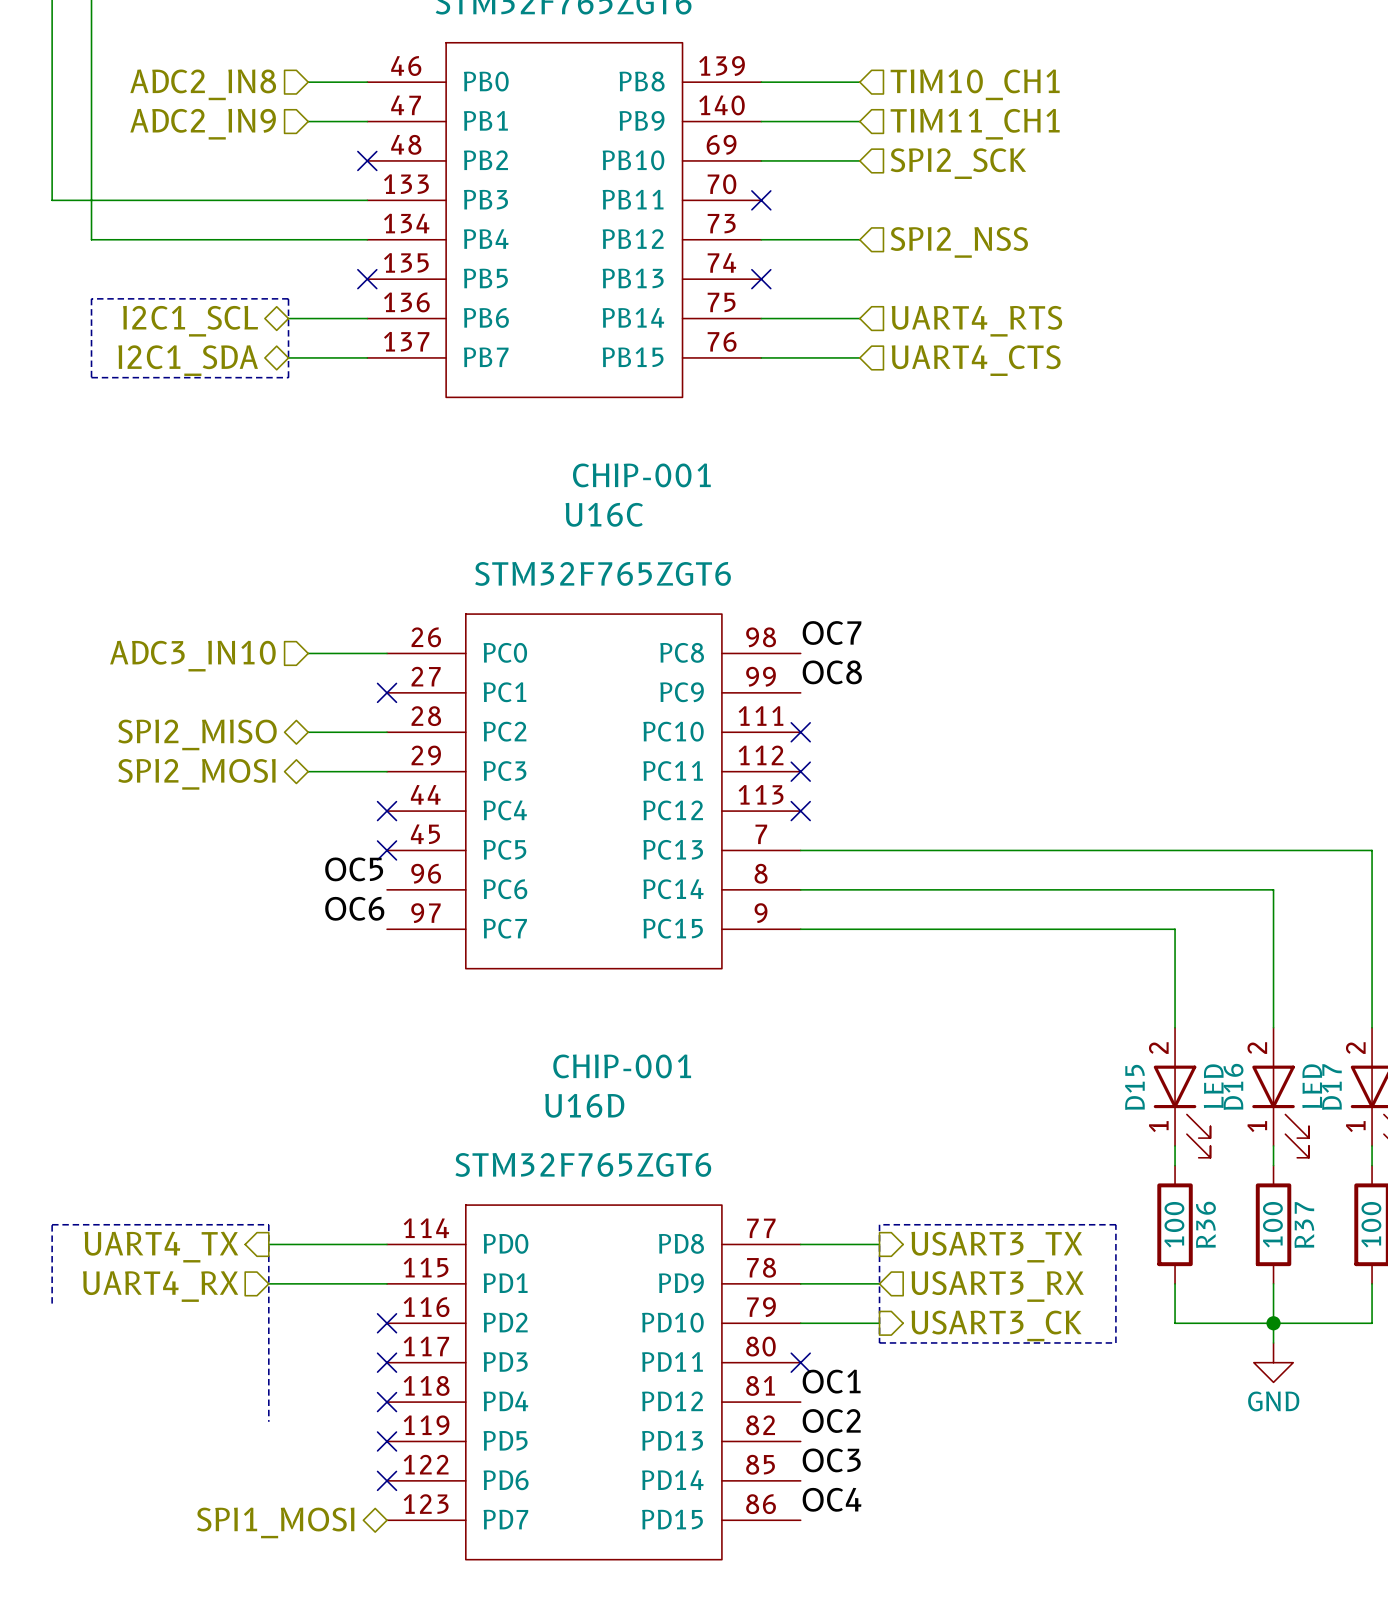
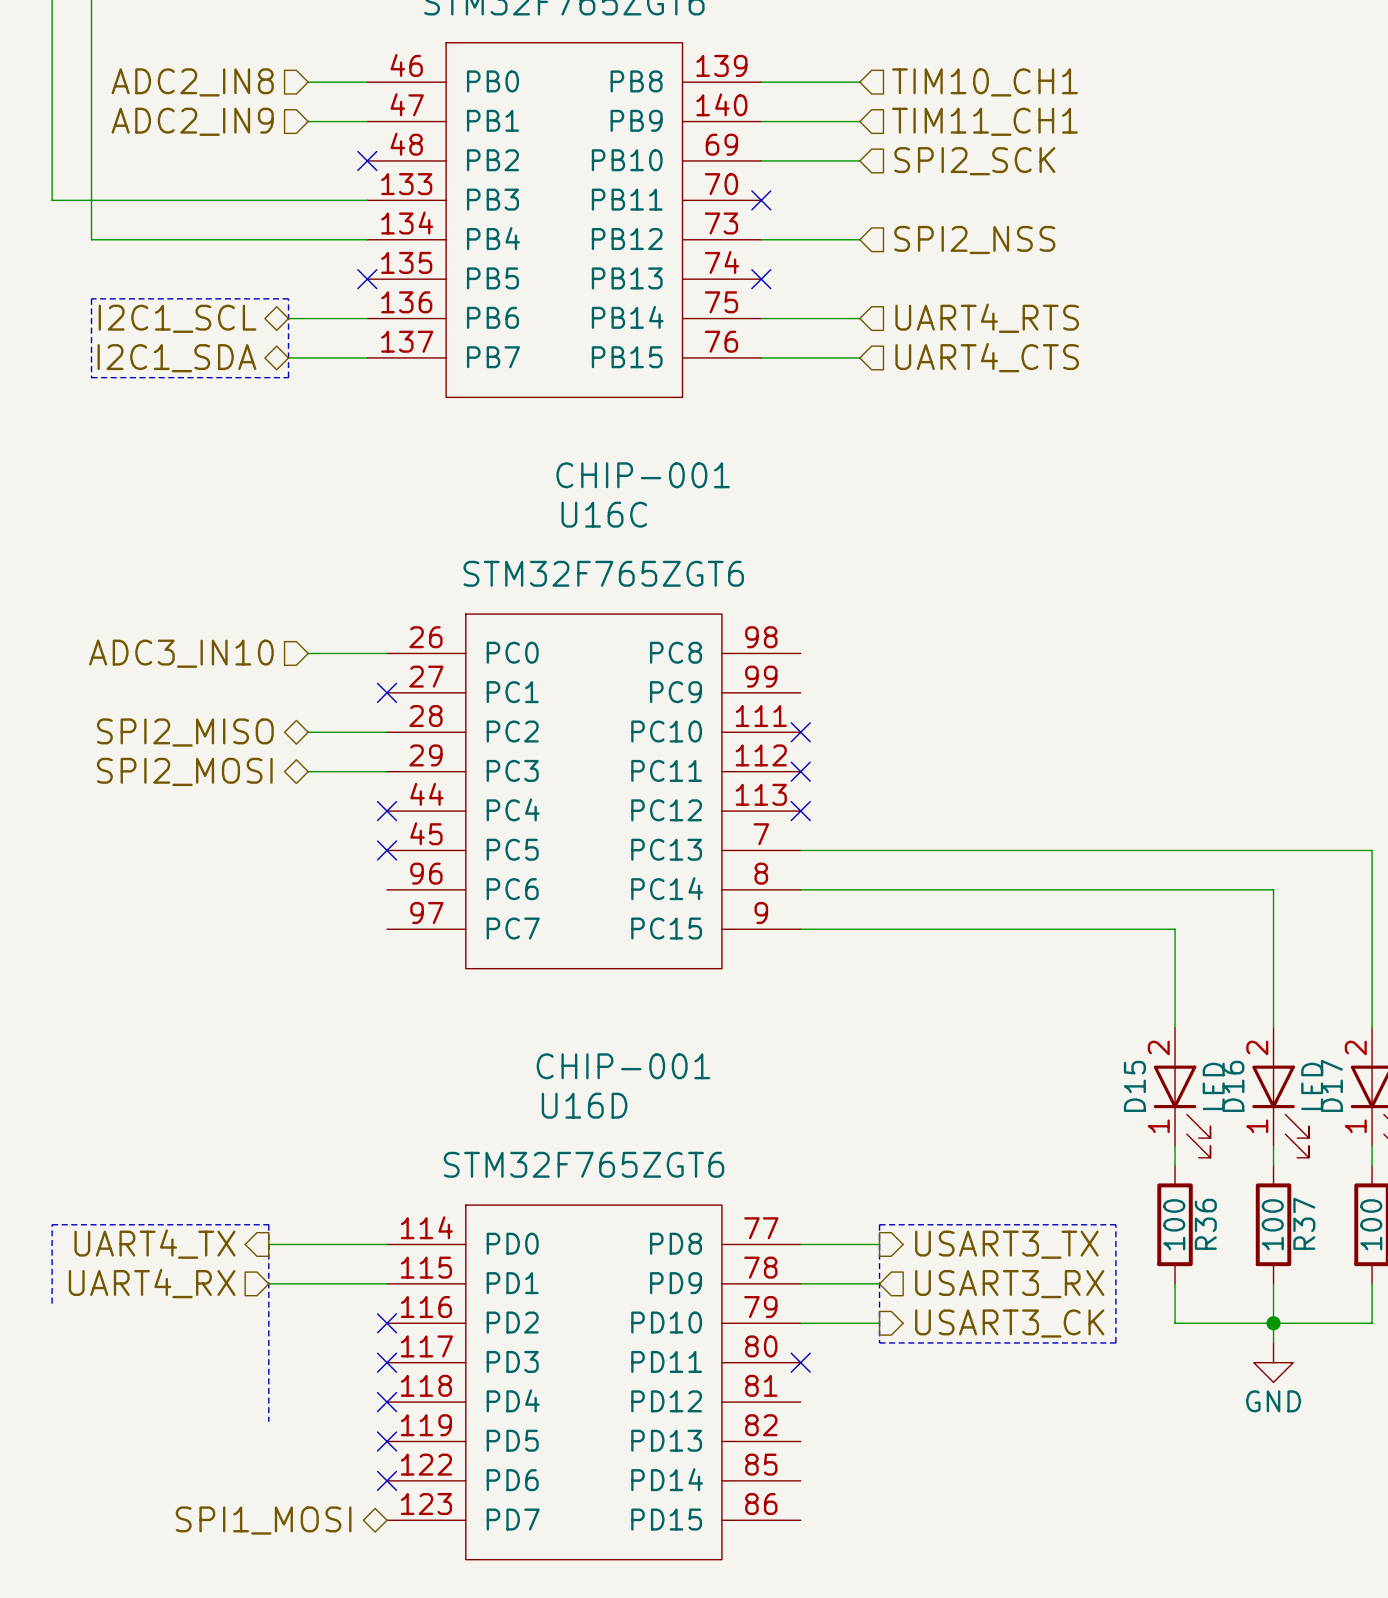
label: OC7 (832, 633) -> none
label: OC8 (832, 672) -> none
label: OC5 (354, 869) -> none
label: OC6 (354, 908) -> none
label: OC1 (831, 1381) -> none
label: OC2 (831, 1421) -> none
label: OC3 (831, 1460) -> none
label: OC4 (832, 1499) -> none

